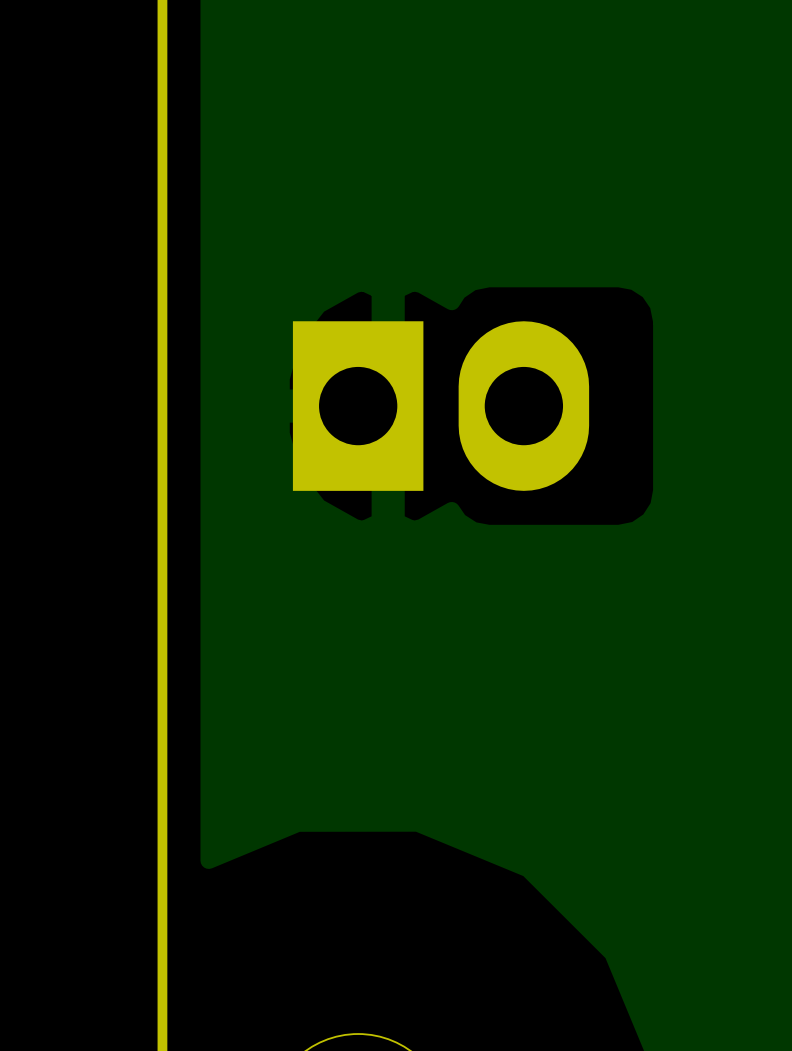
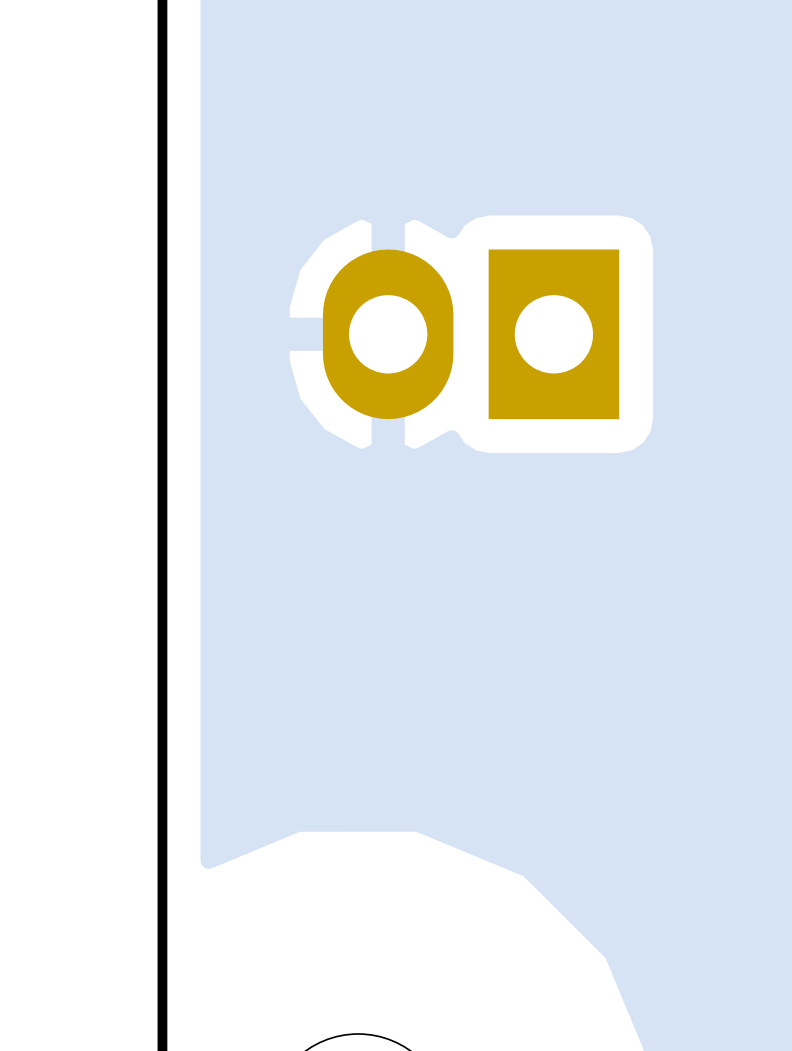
part rotation: 0° (441, 406) -> 180° (471, 334)

